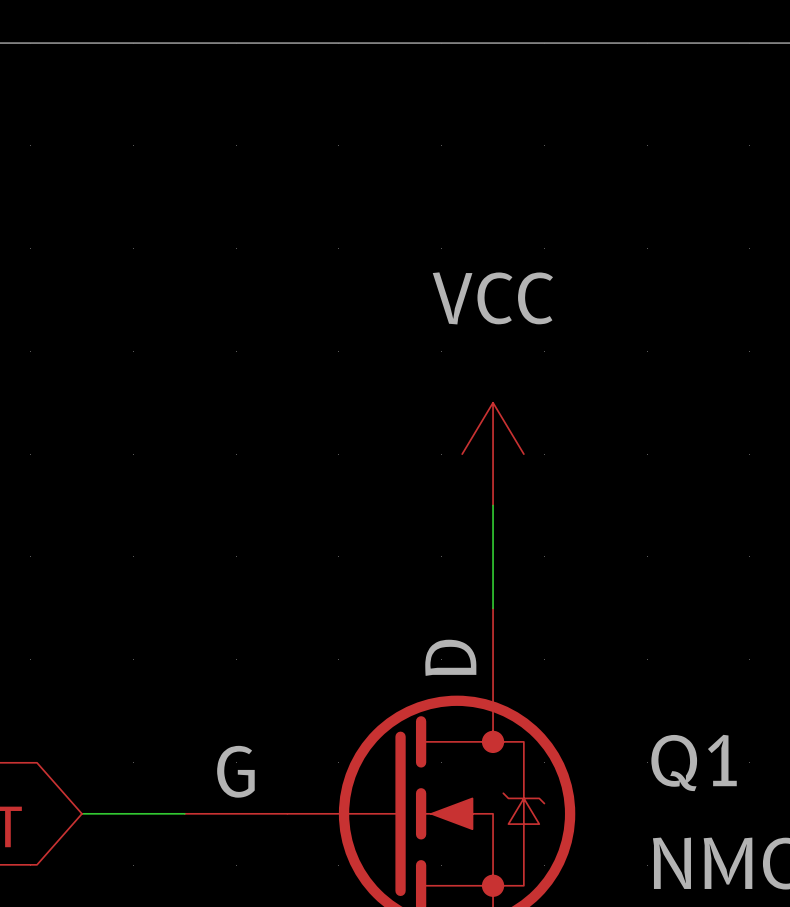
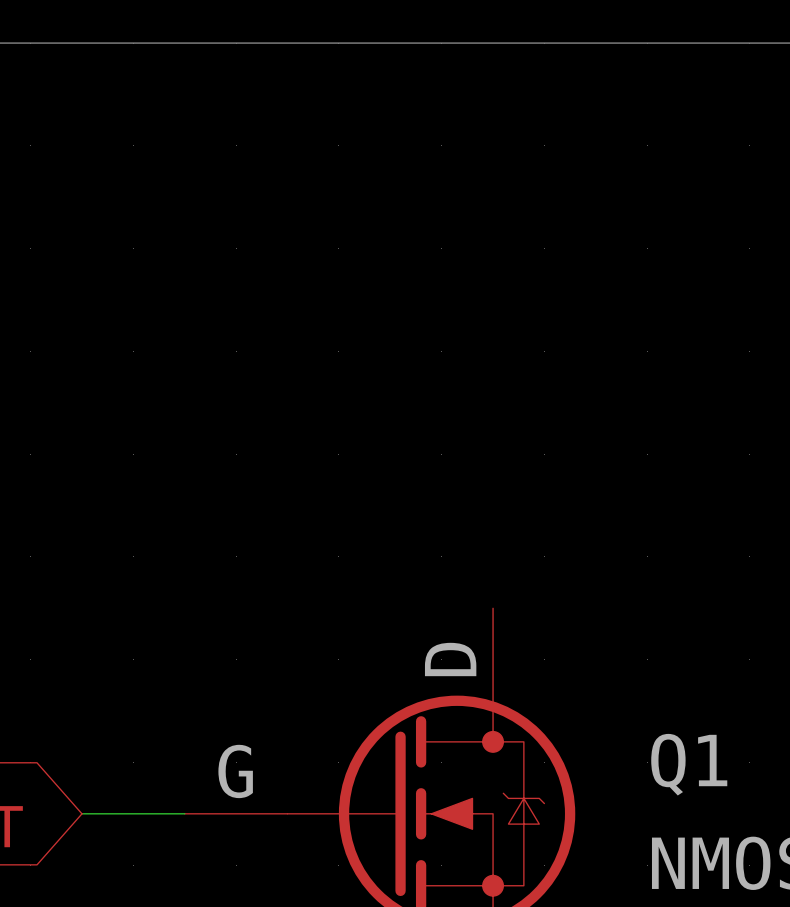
power symbol: VCC (493, 454) -> none
wire: (493, 505) (493, 608) -> none

